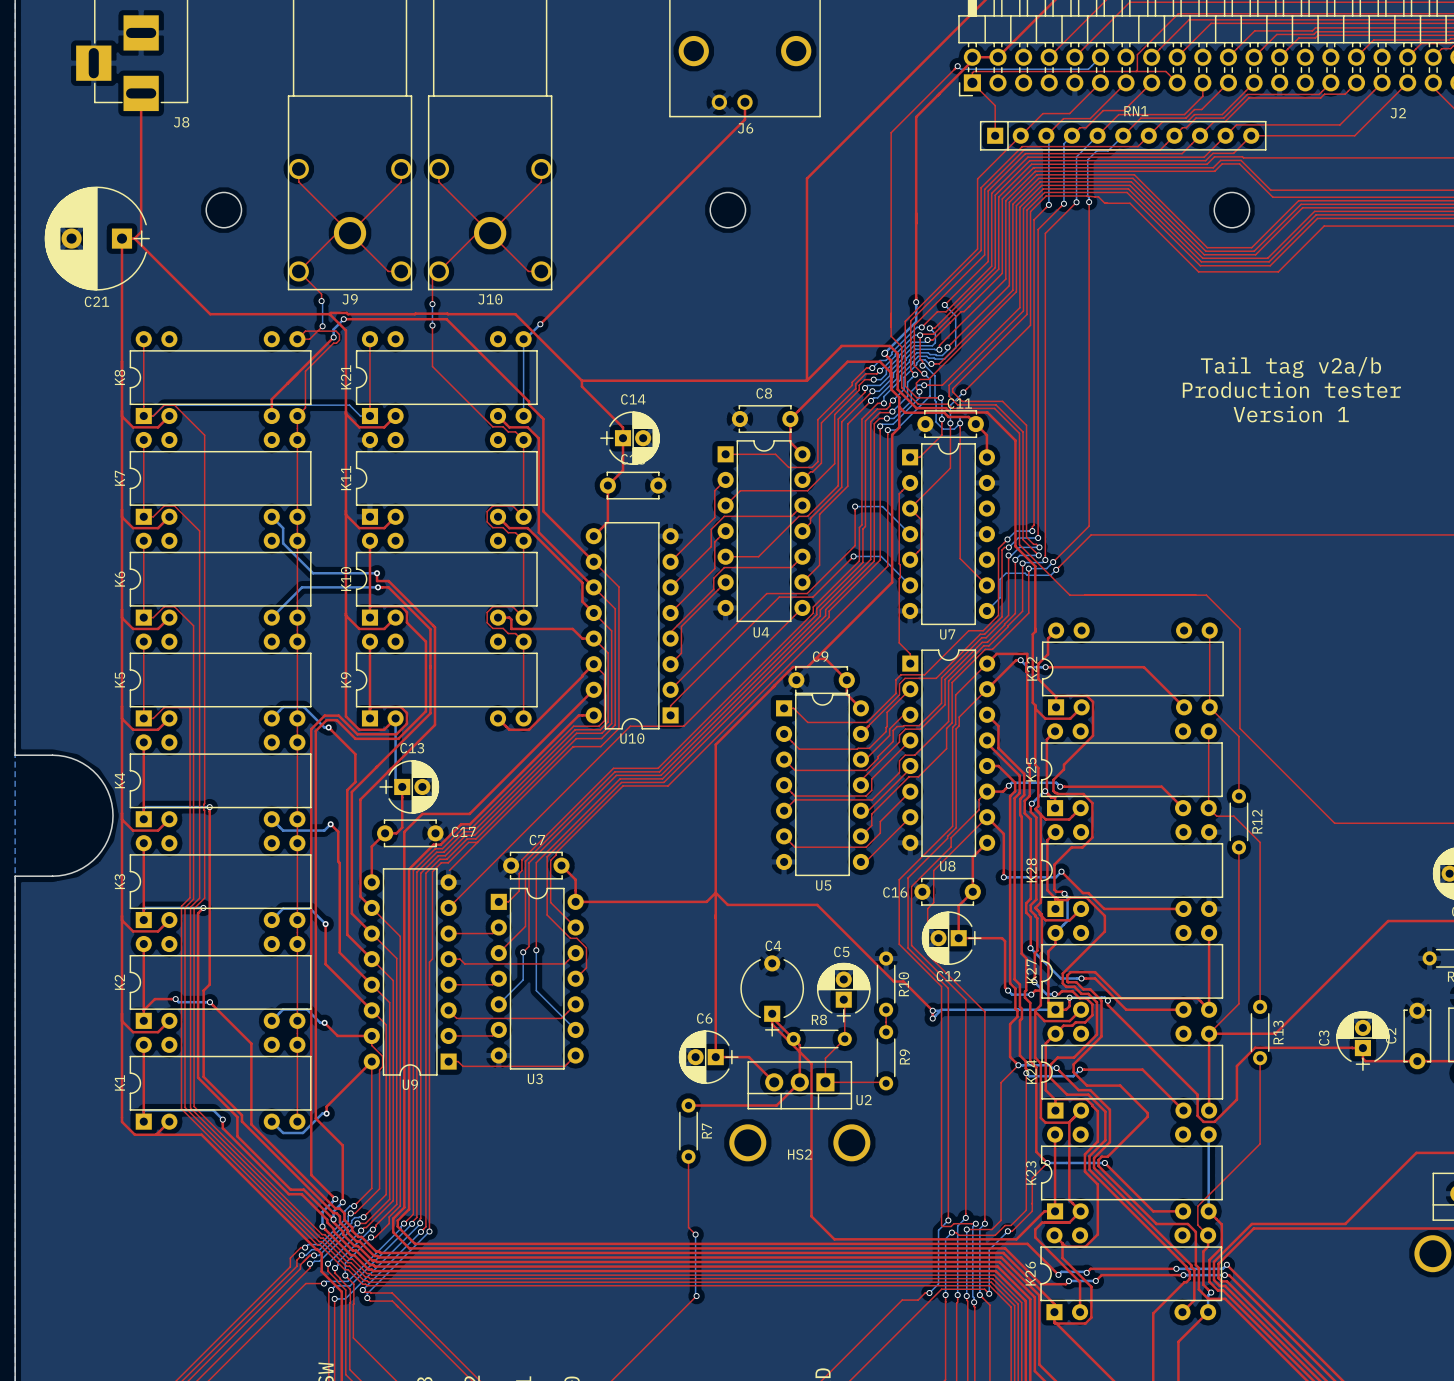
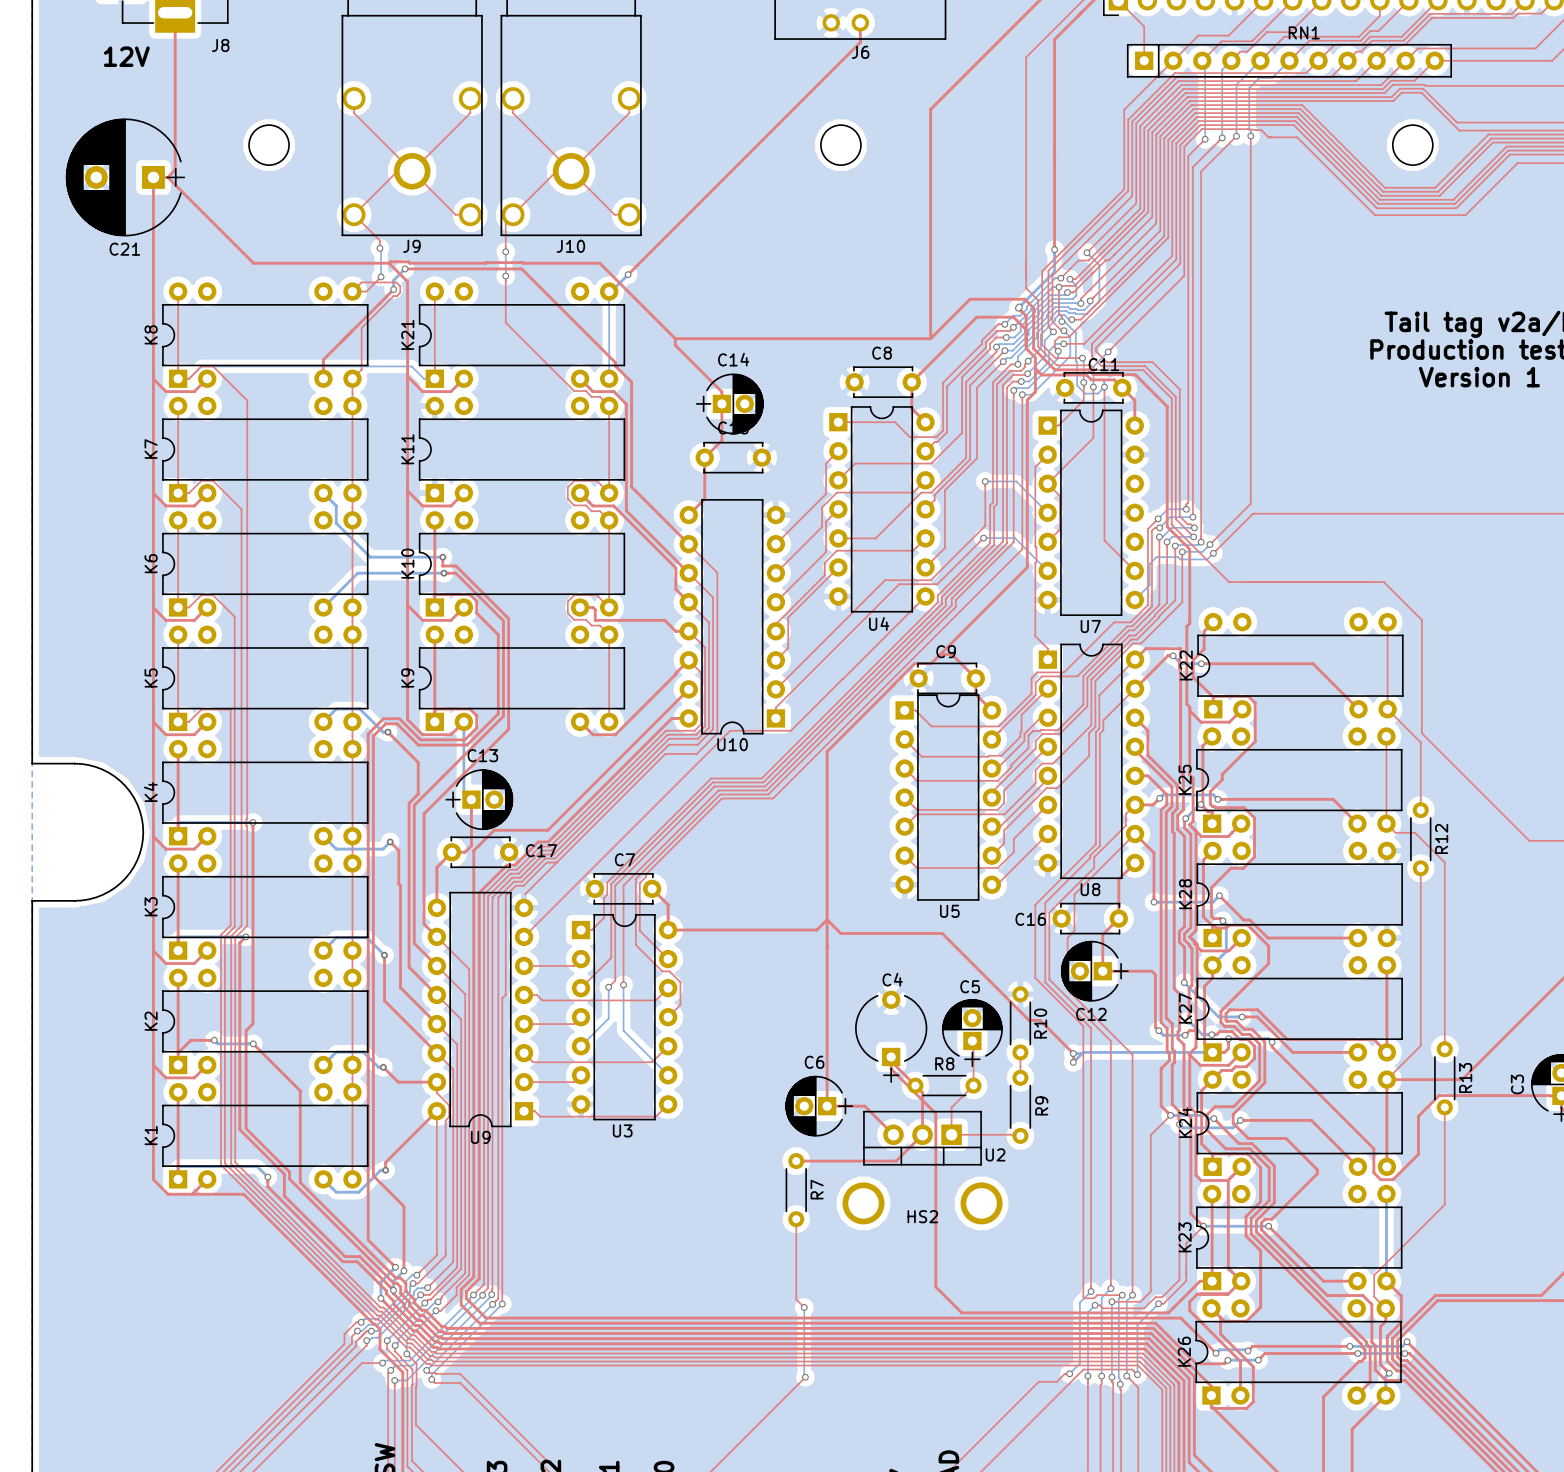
text: none -> 12V (126, 56)

